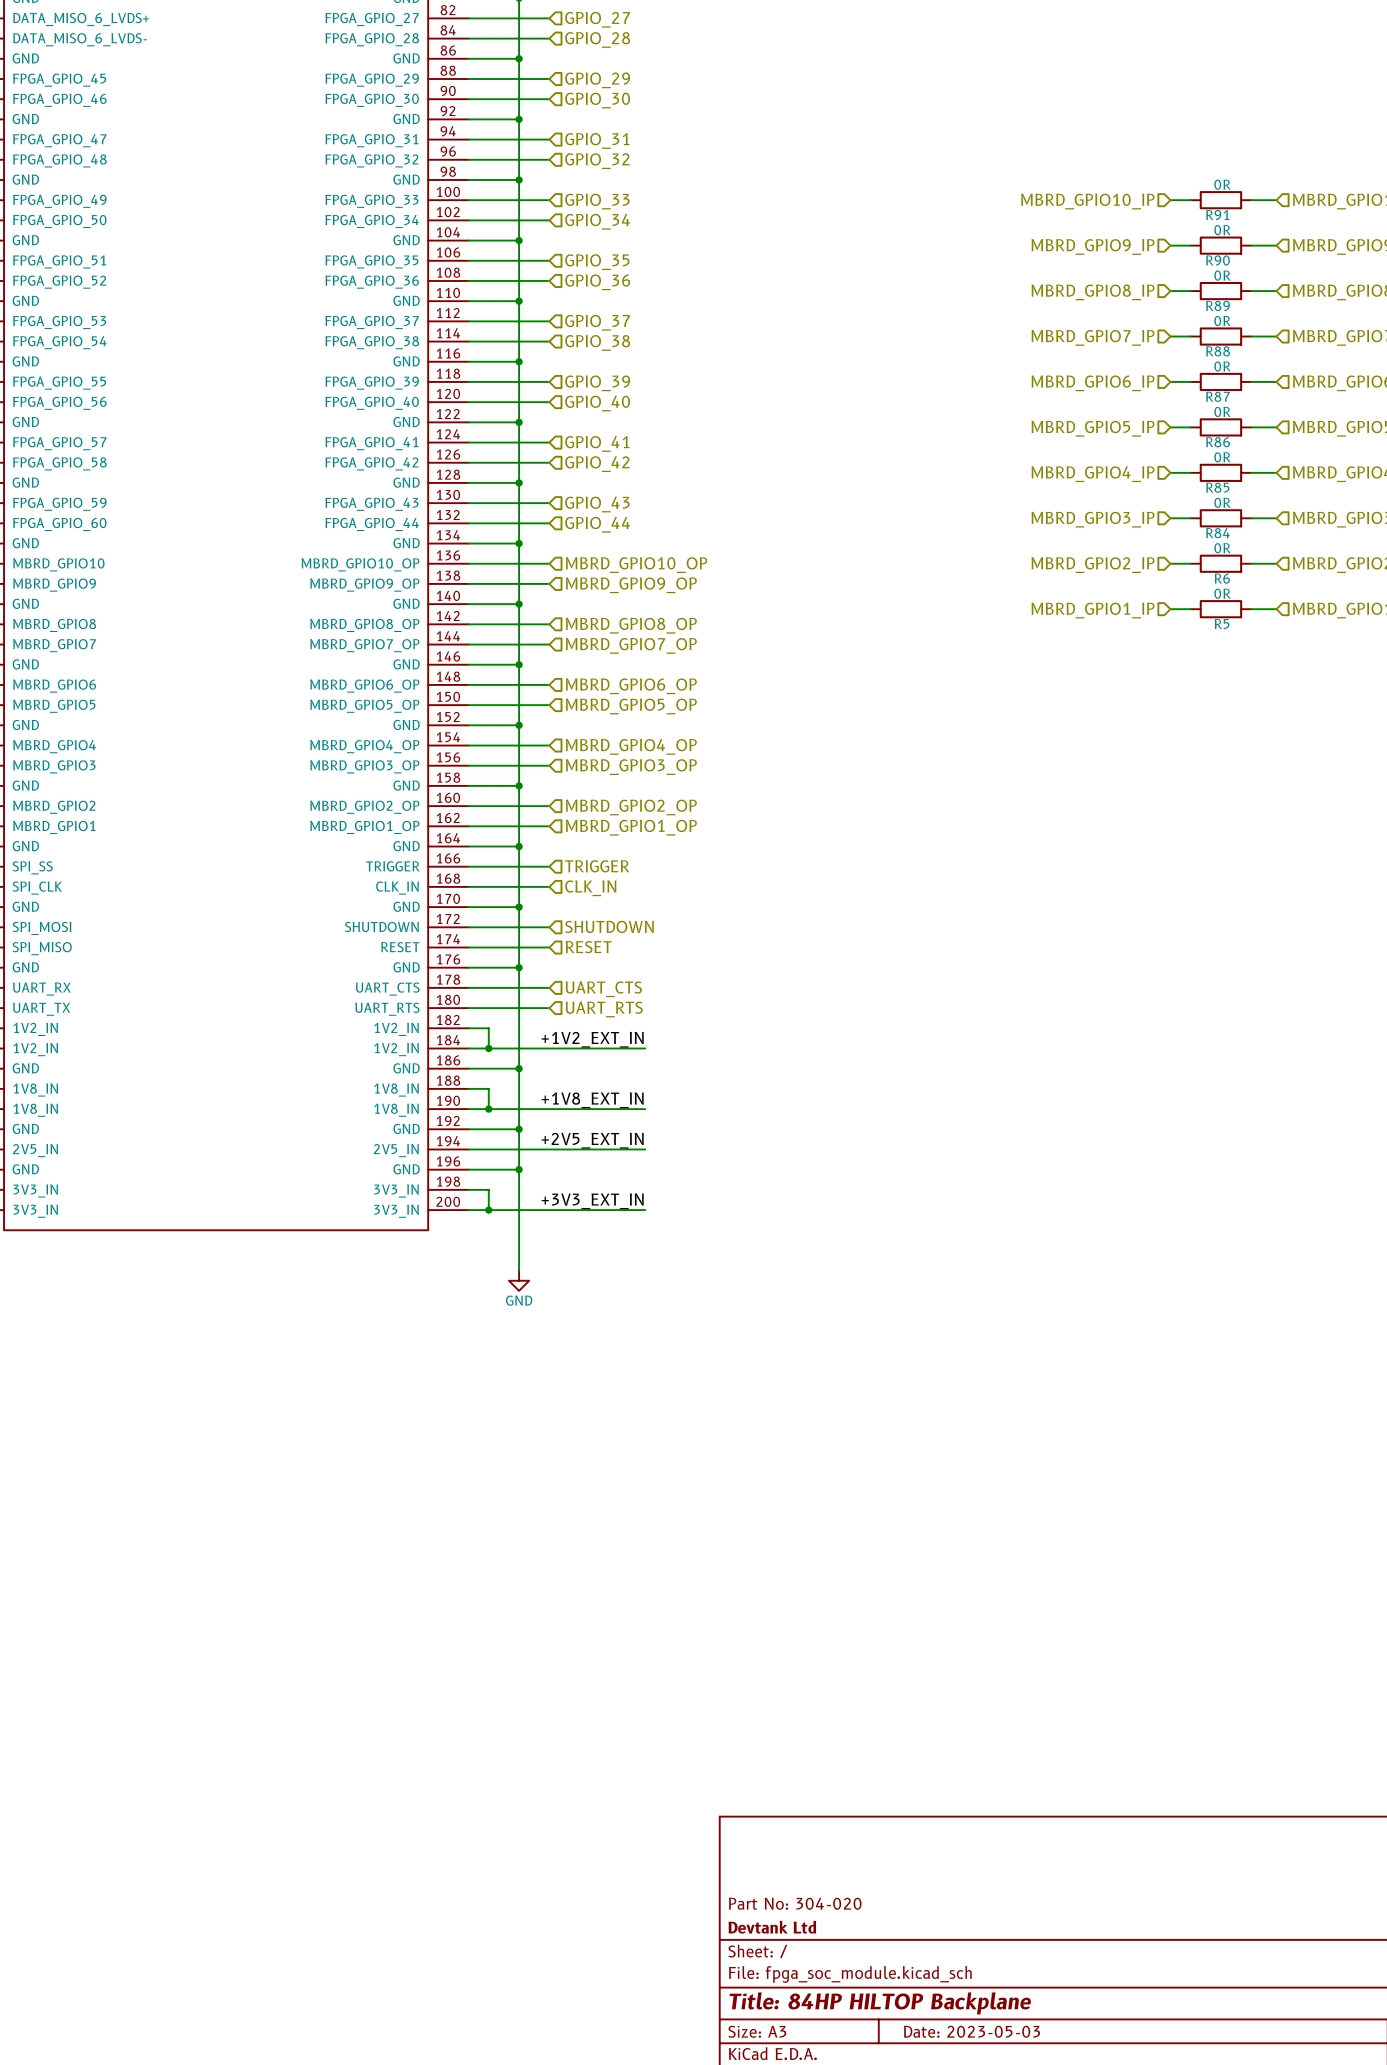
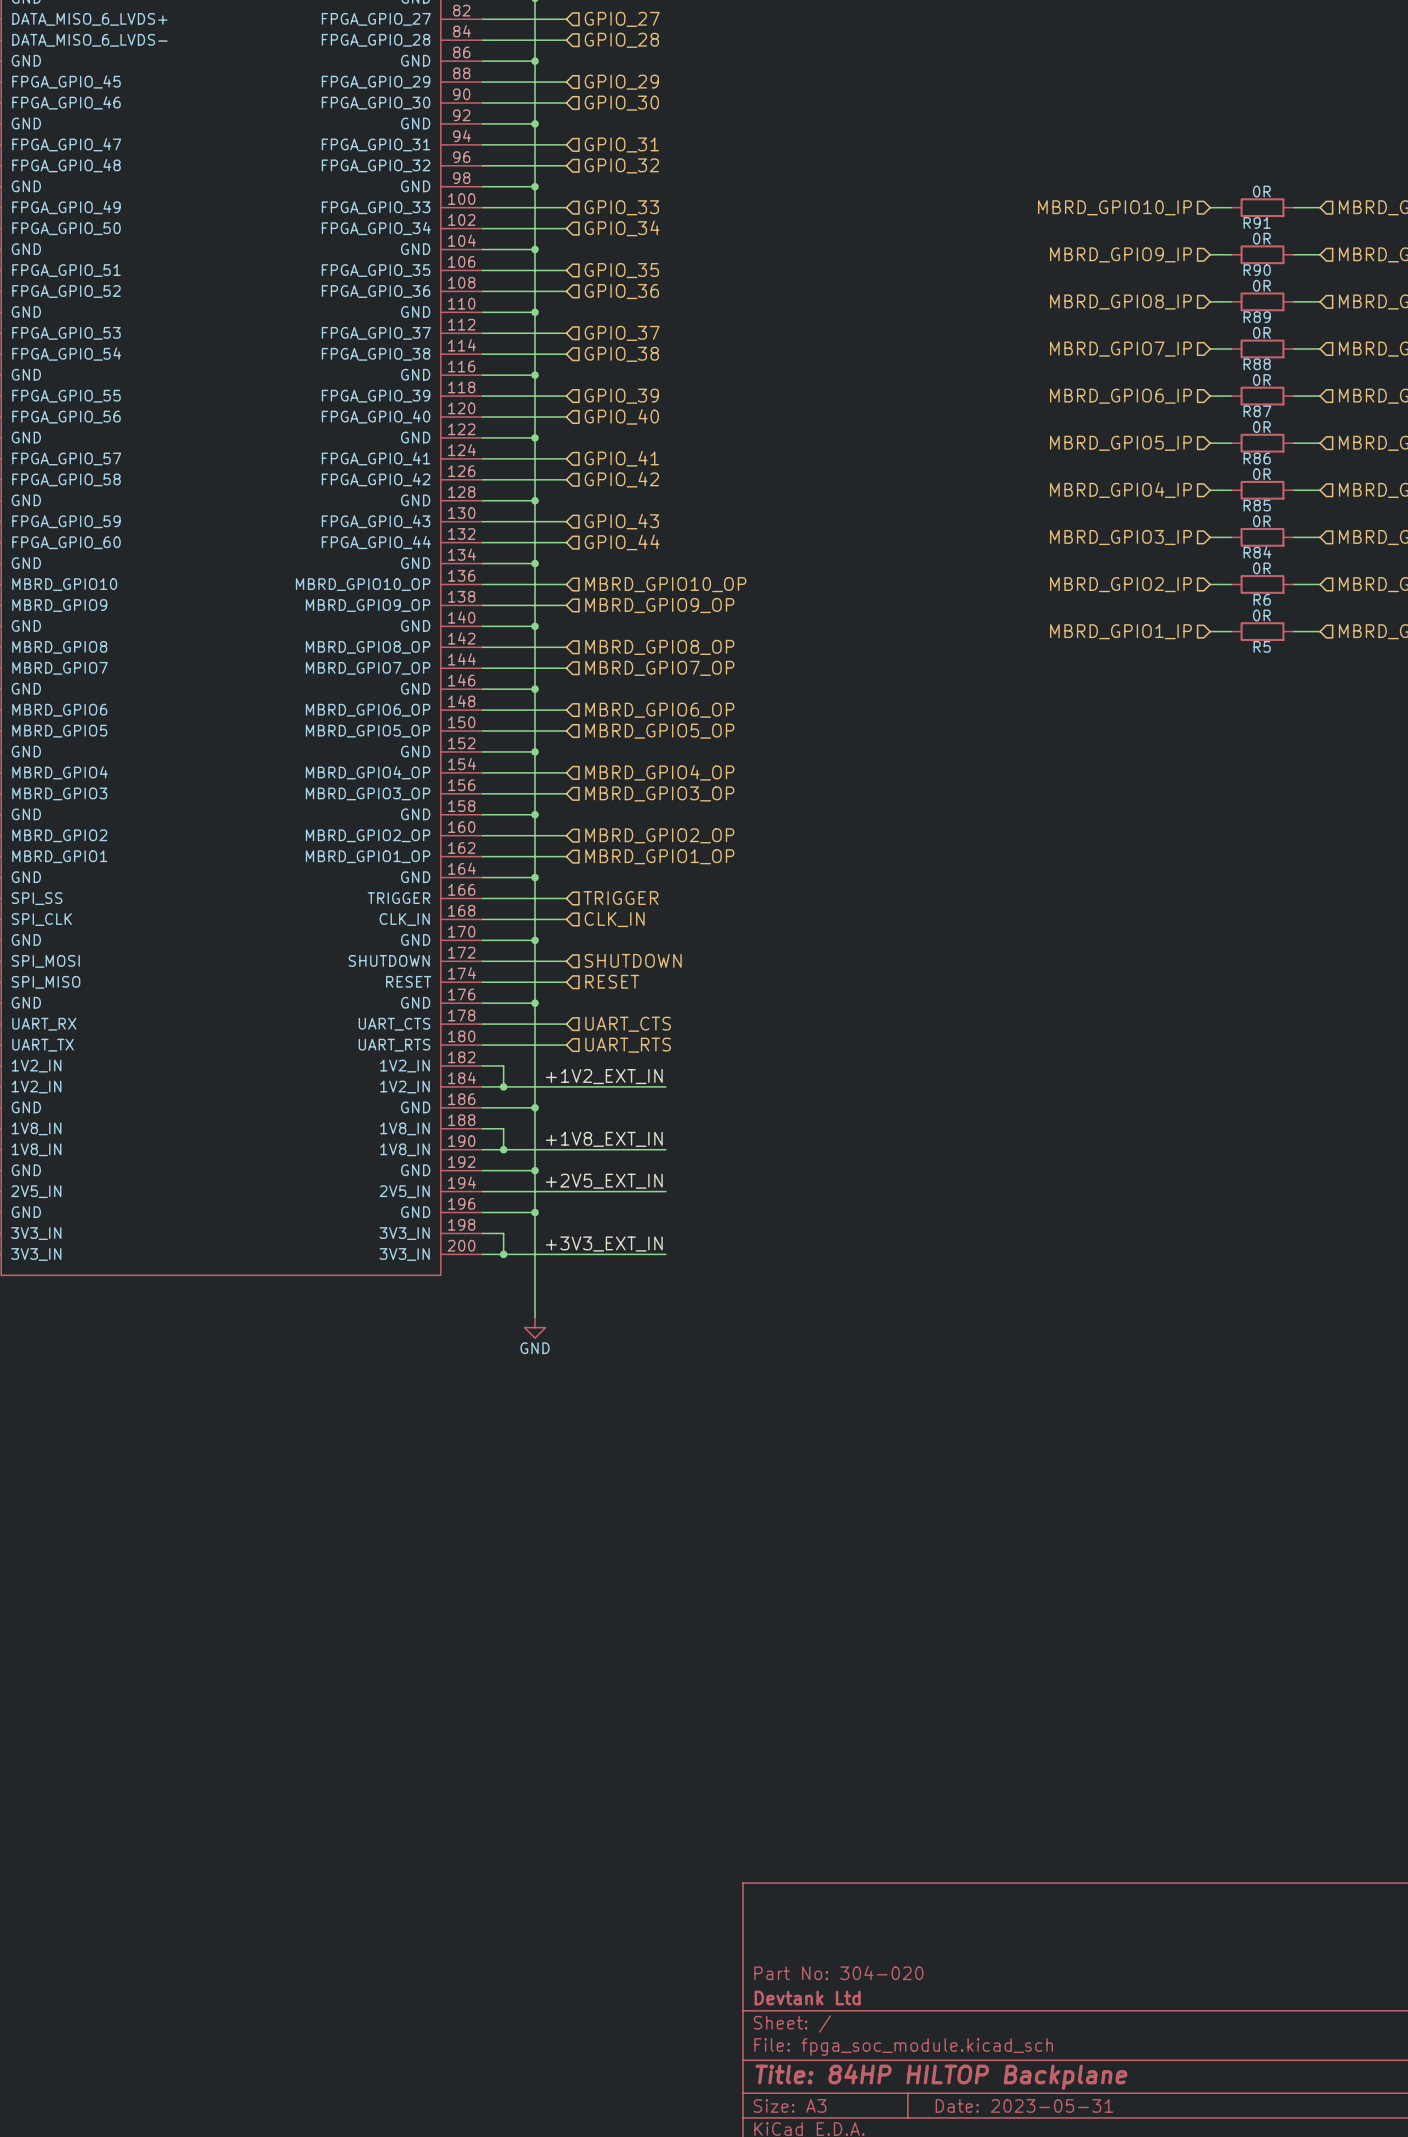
title block: Date: 2023-05-03 (971, 2031) -> Date: 2023-05-31 (1024, 2105)

